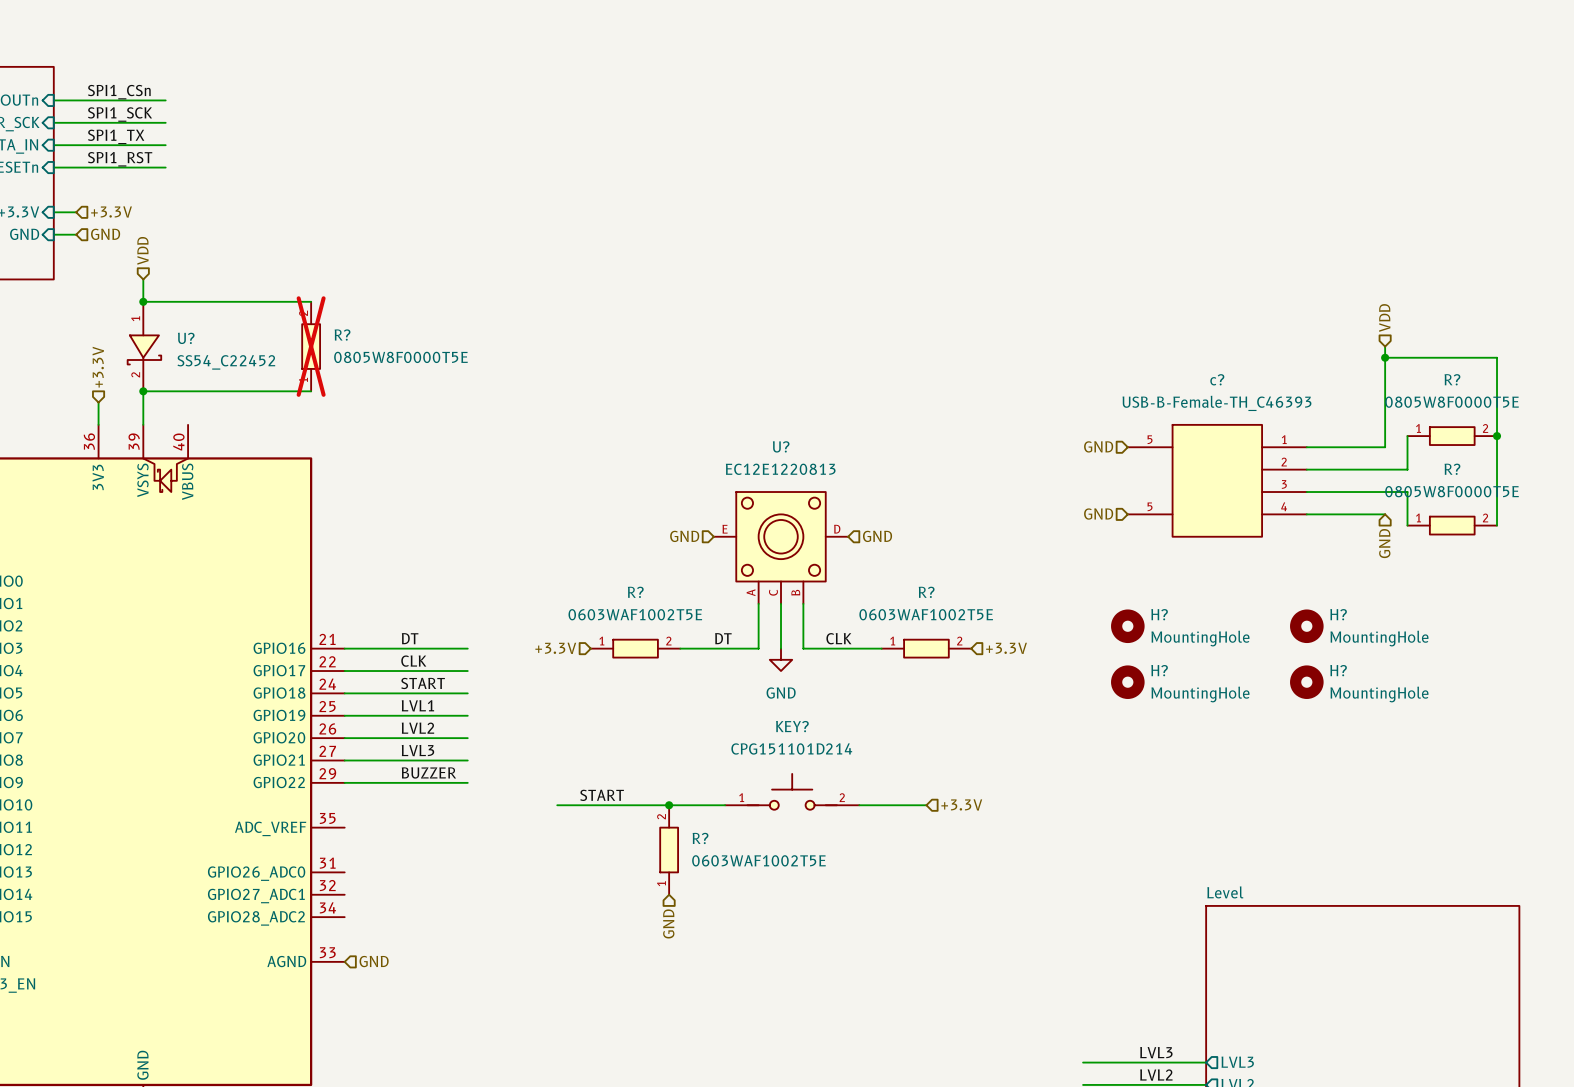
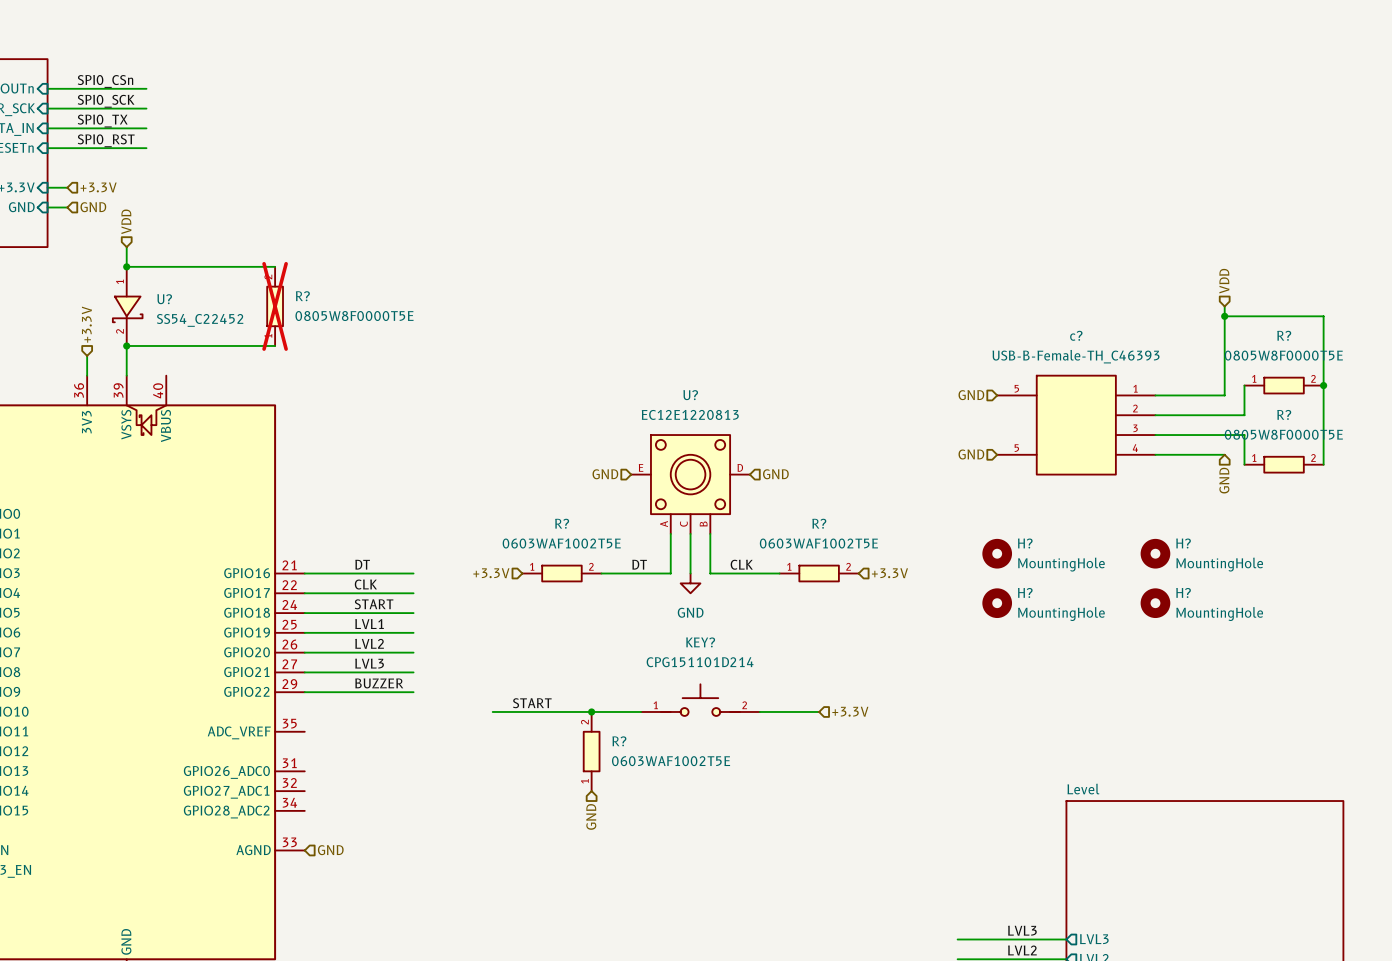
label: SPI1_CSn (119, 92) -> SPI0_CSn (105, 81)
label: SPI1_SCK (120, 114) -> SPI0_SCK (106, 101)
label: SPI1_TX (116, 136) -> SPI0_TX (102, 121)
label: SPI1_RST (120, 159) -> SPI0_RST (106, 140)

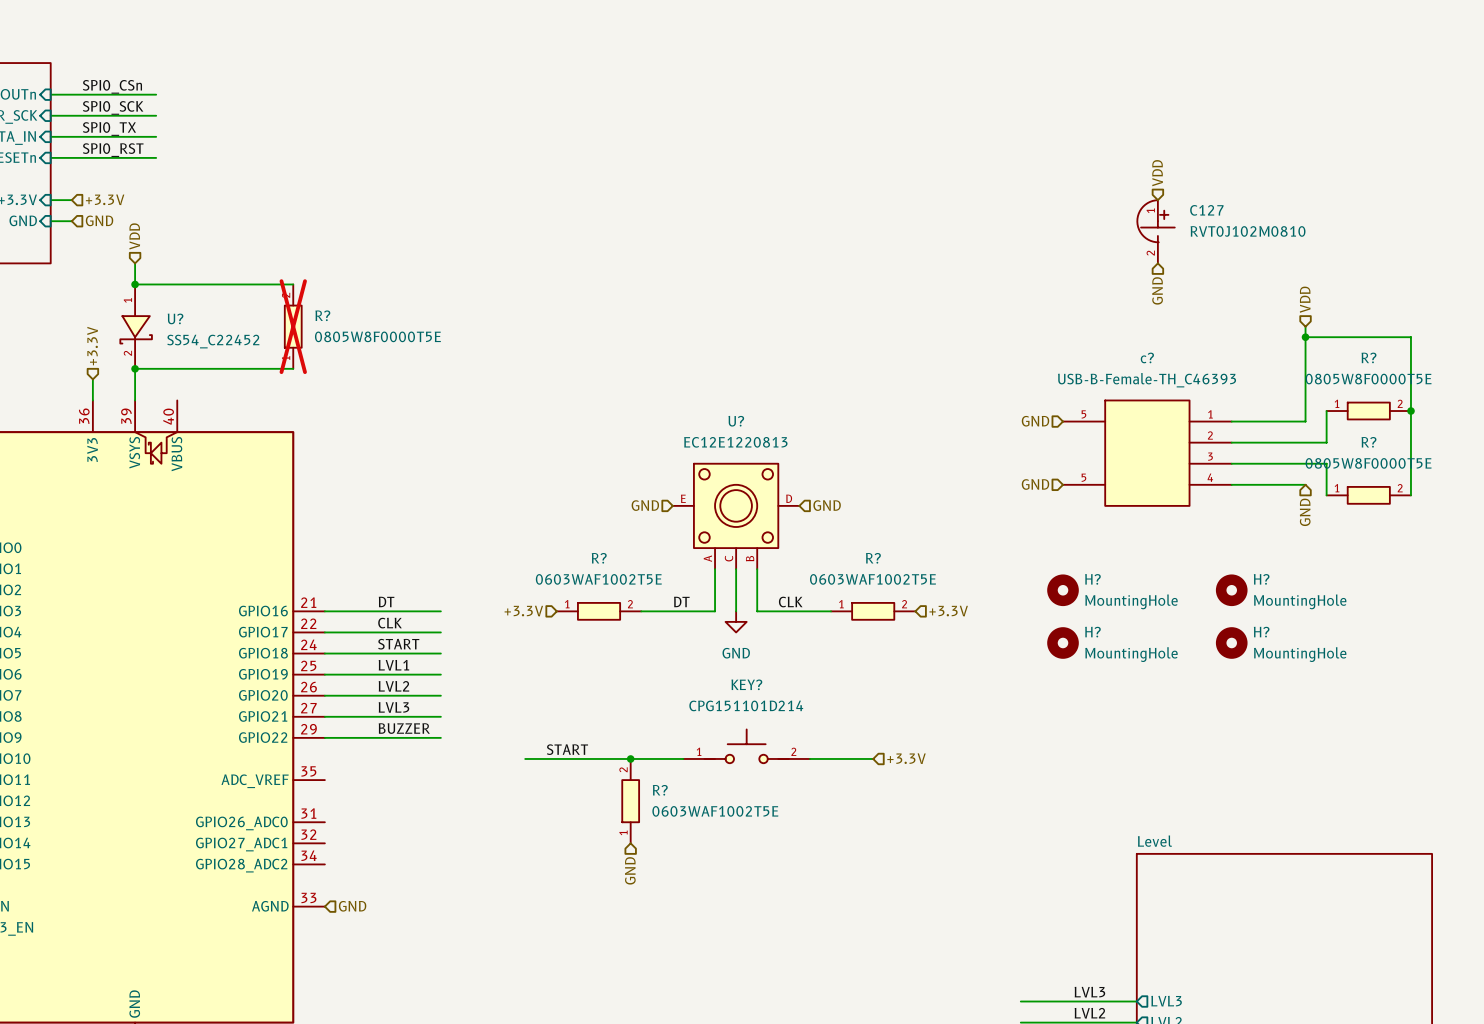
hierarchical label: none -> VDD (1157, 173)
C127: none -> RVT0J102M0810 (1156, 231)
hierarchical label: none -> GND (1157, 290)

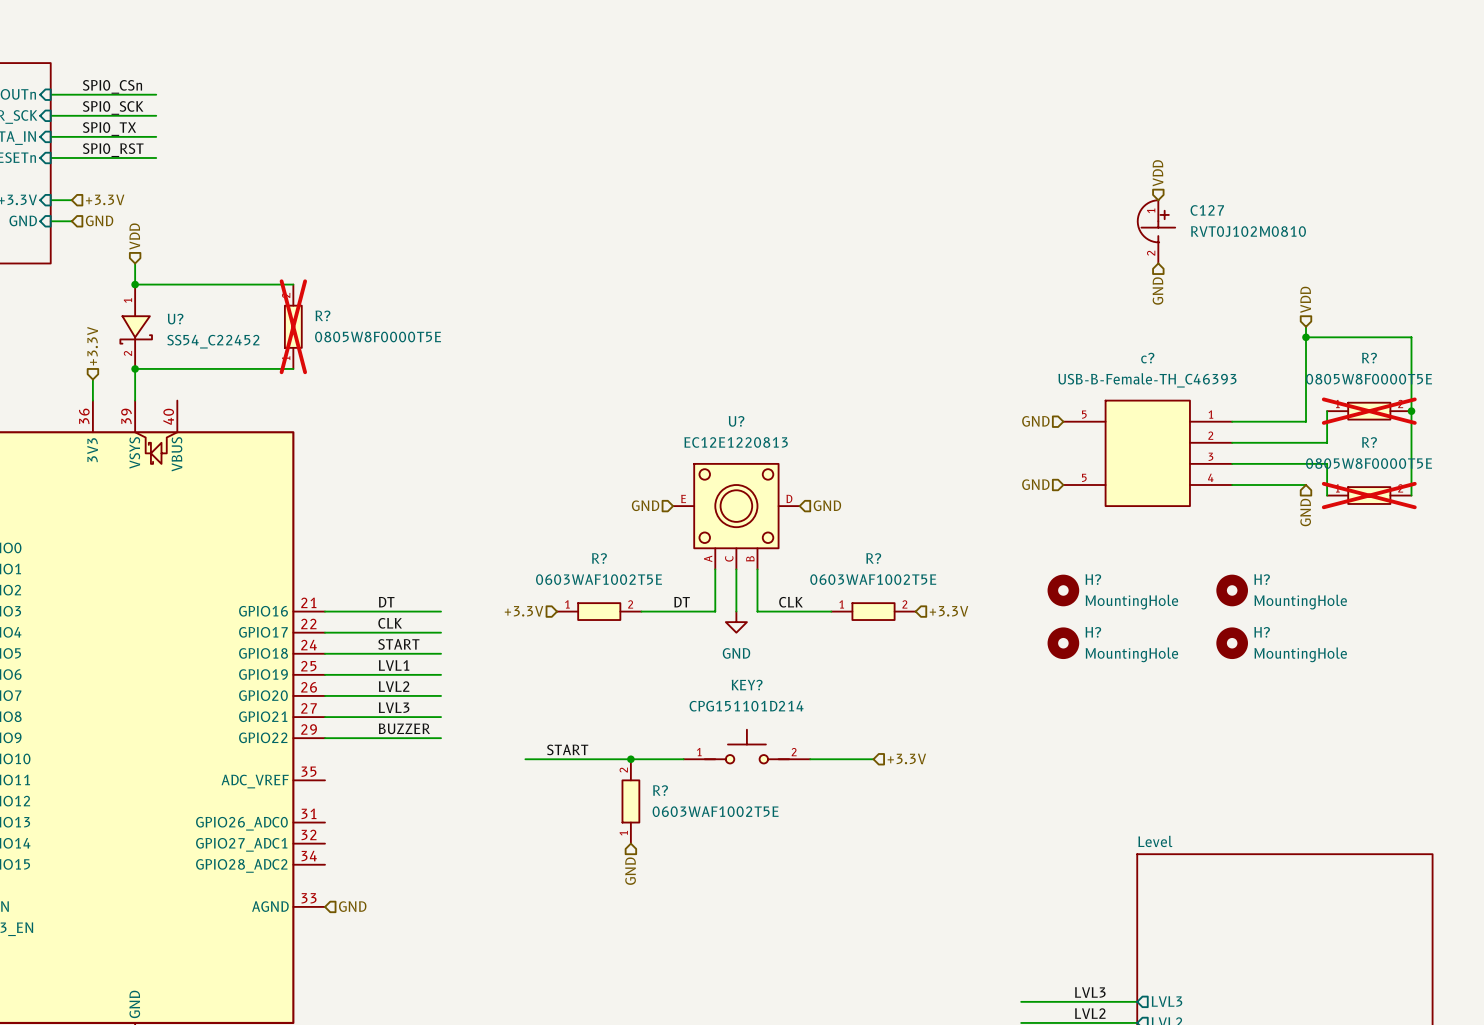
R? do-not-place cross: none -> (1369, 411)
R? do-not-place cross: none -> (1369, 495)

